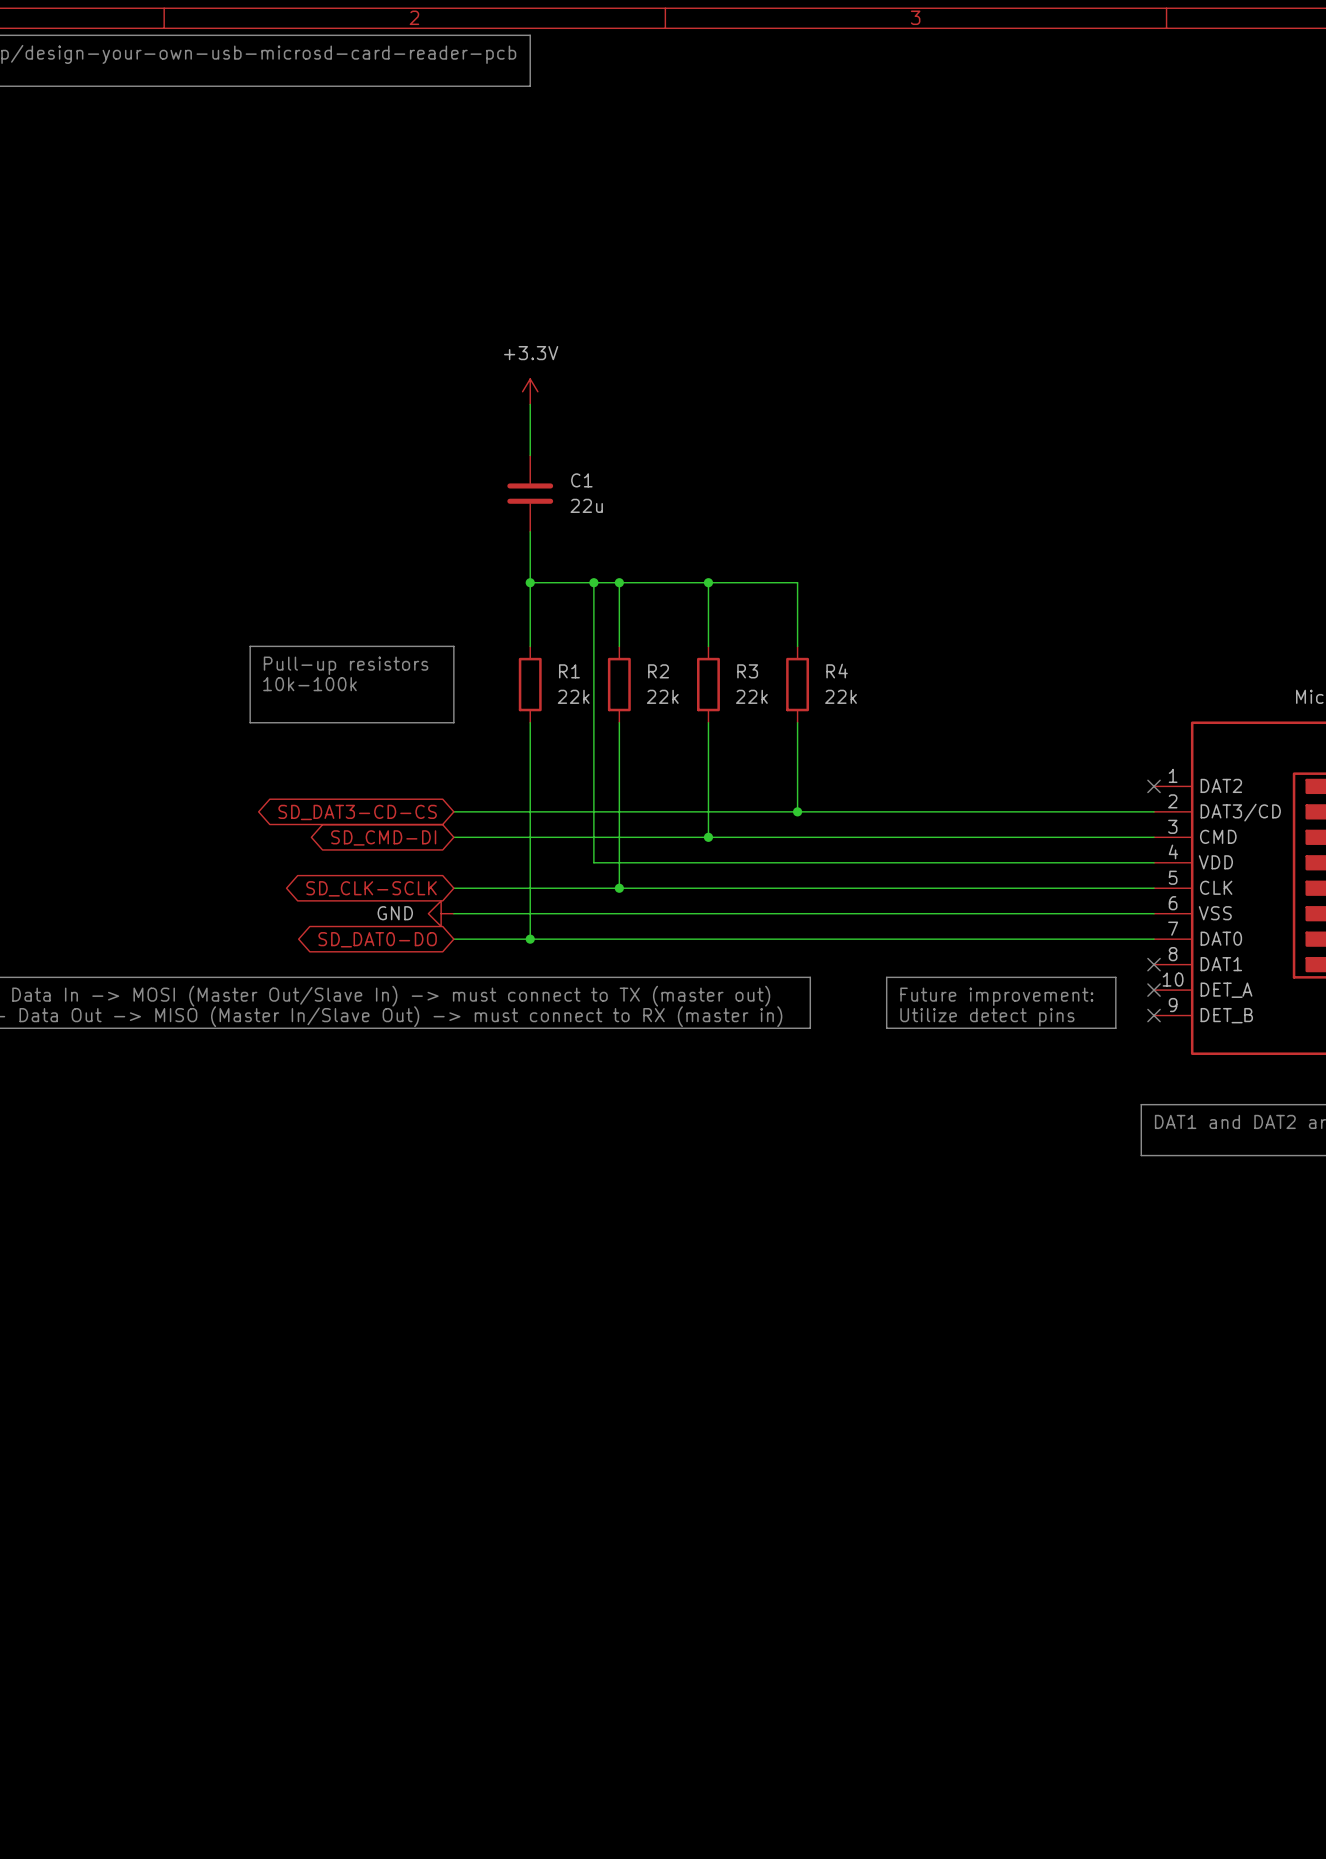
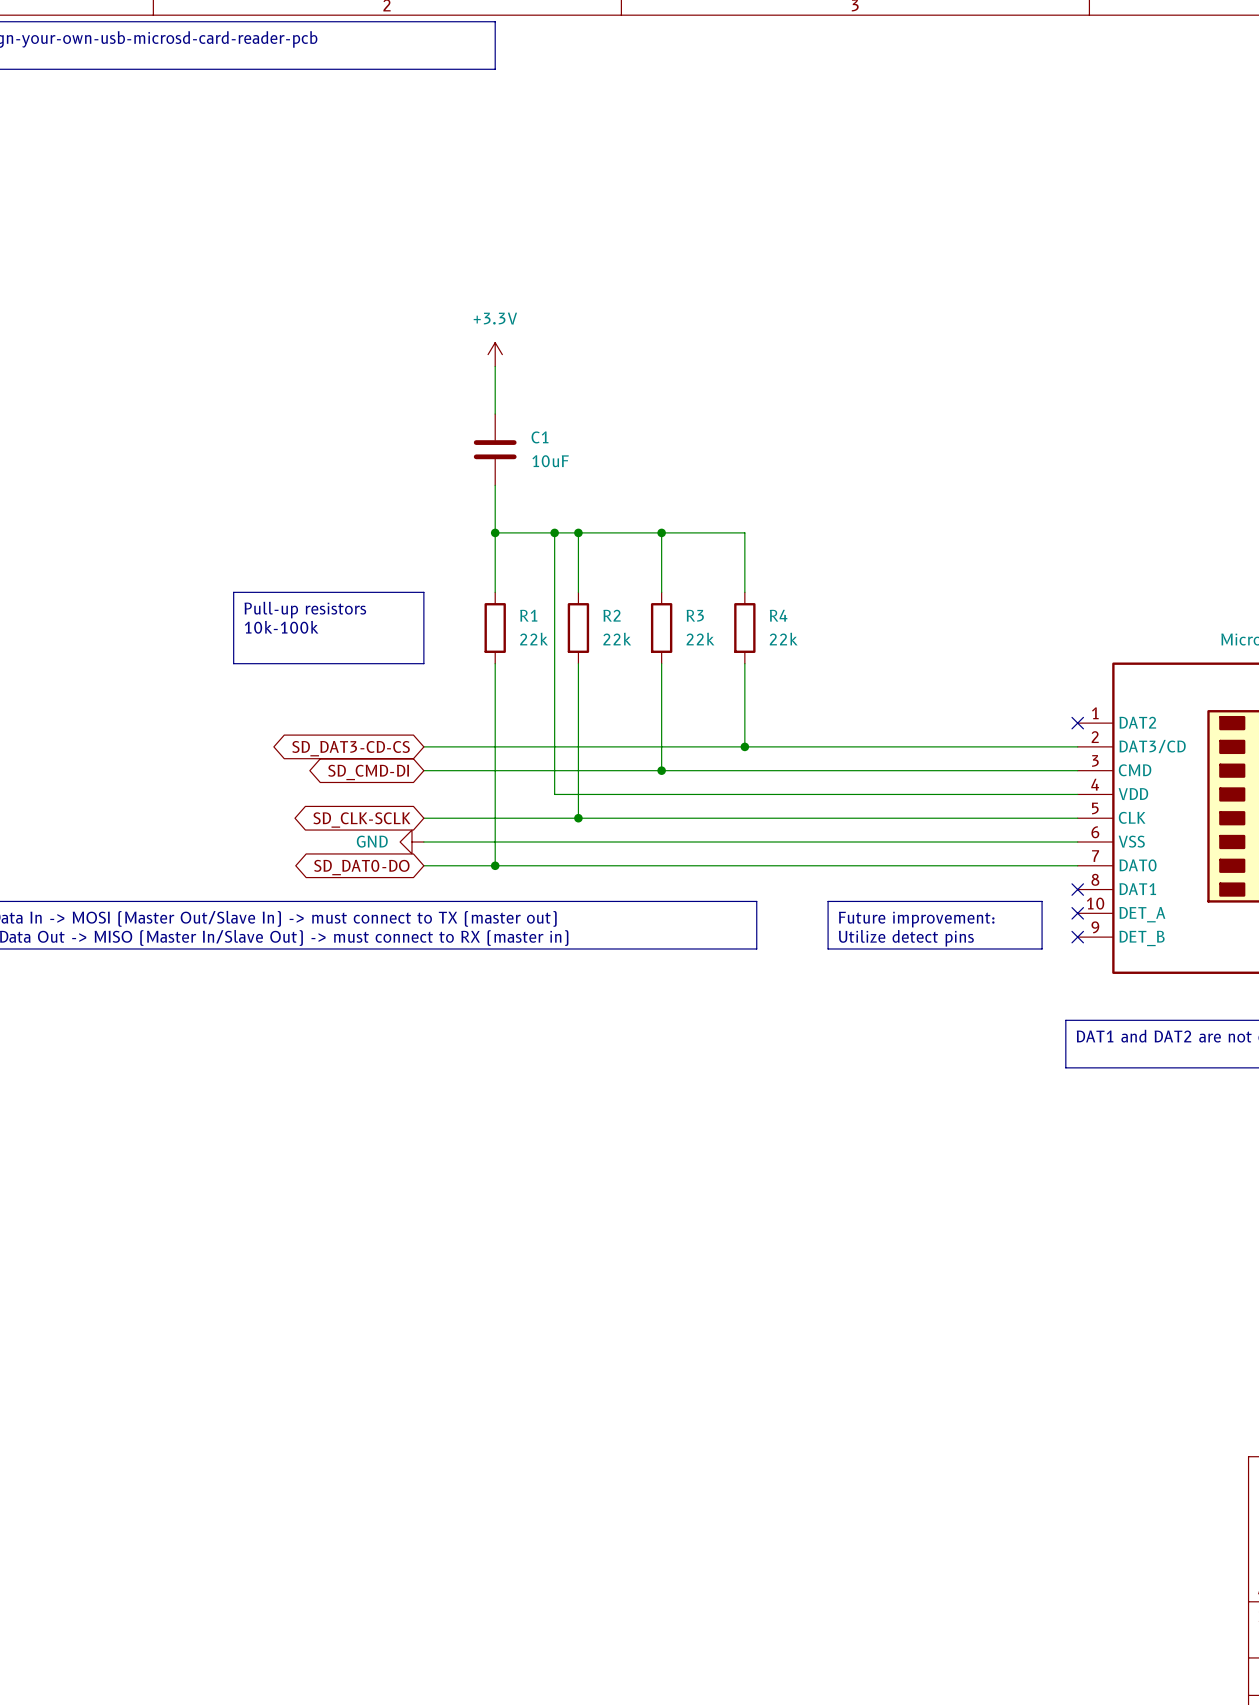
C1 value: 22u (586, 505) -> 10uF (550, 461)

